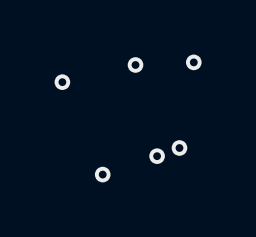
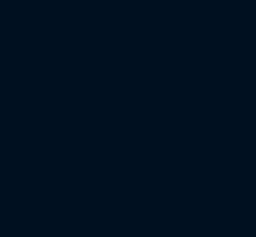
via: (193, 62) -> none
via: (135, 64) -> none
via: (62, 82) -> none
via: (179, 147) -> none
via: (157, 156) -> none
via: (102, 174) -> none

